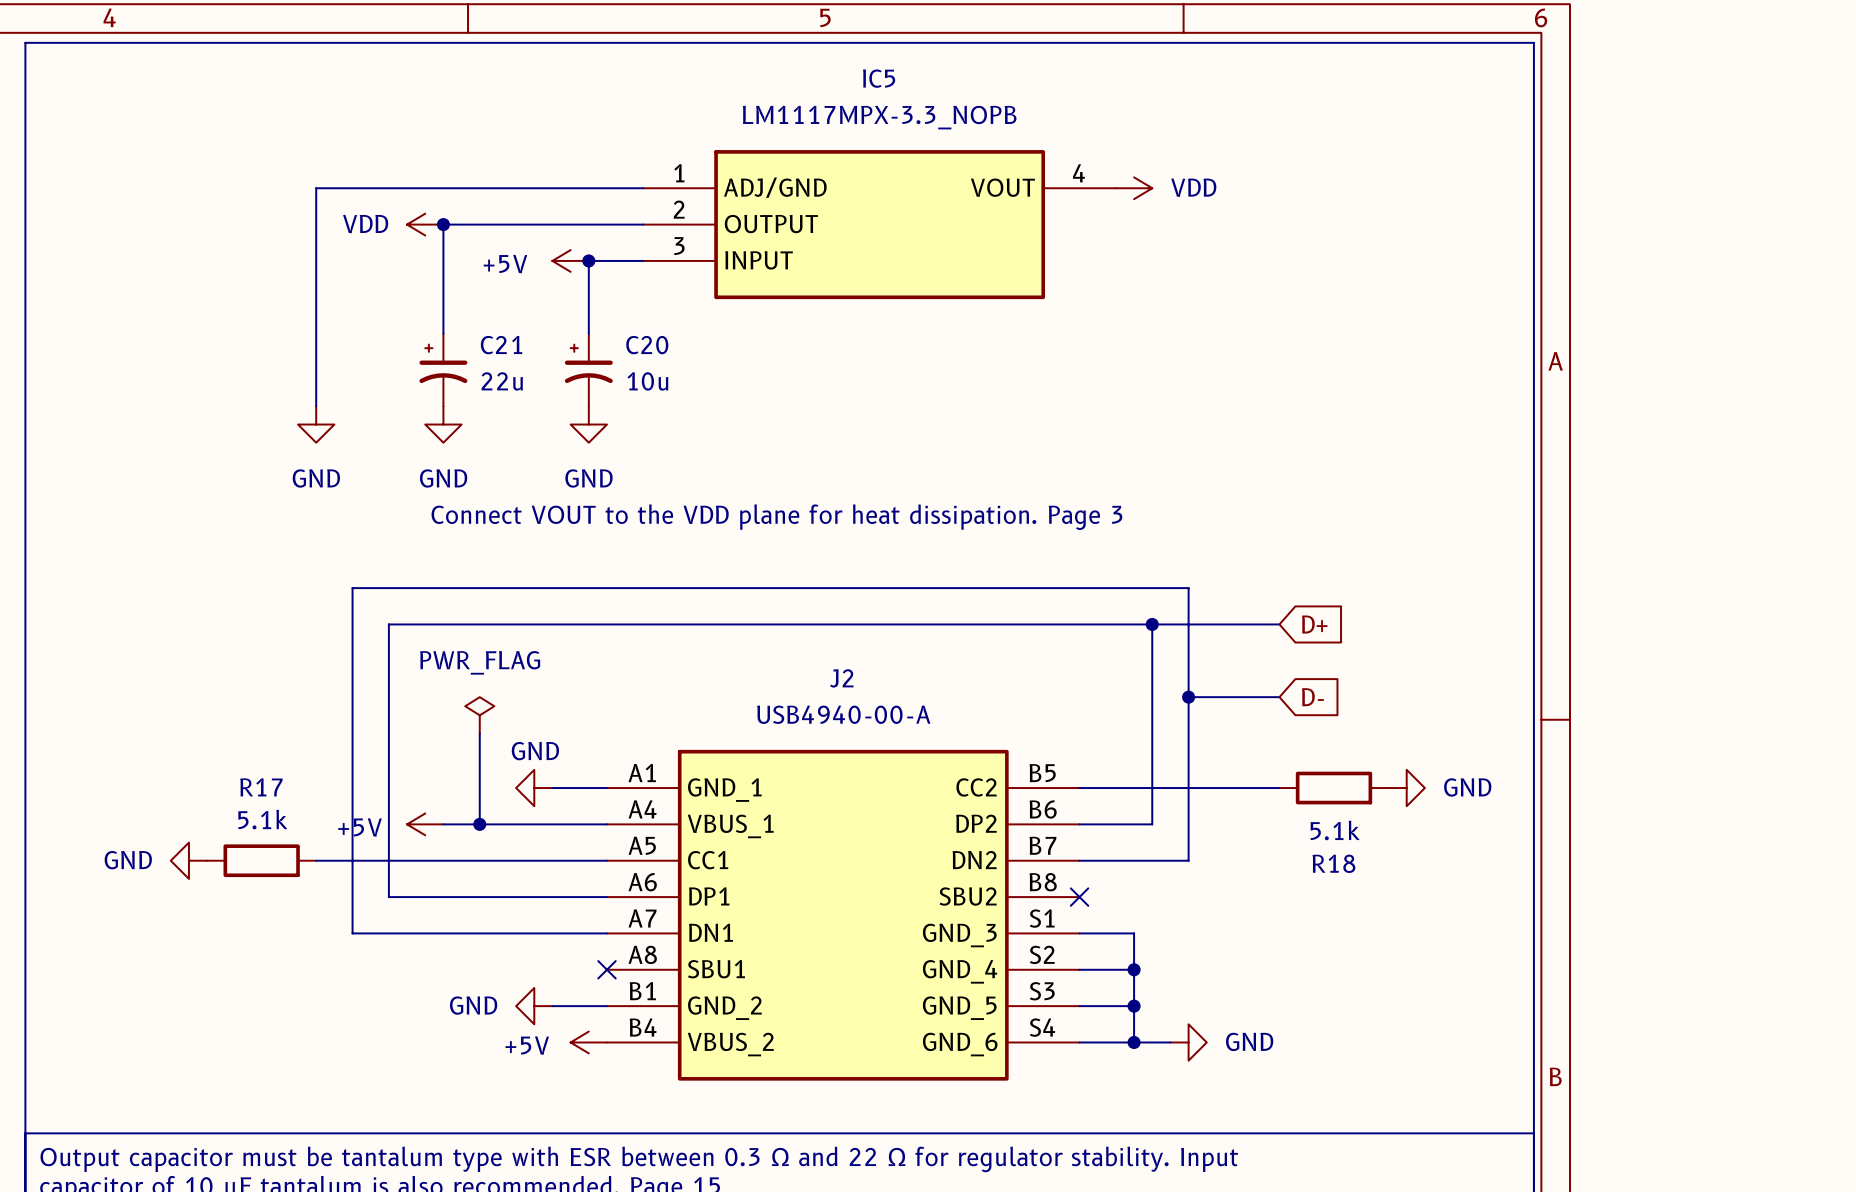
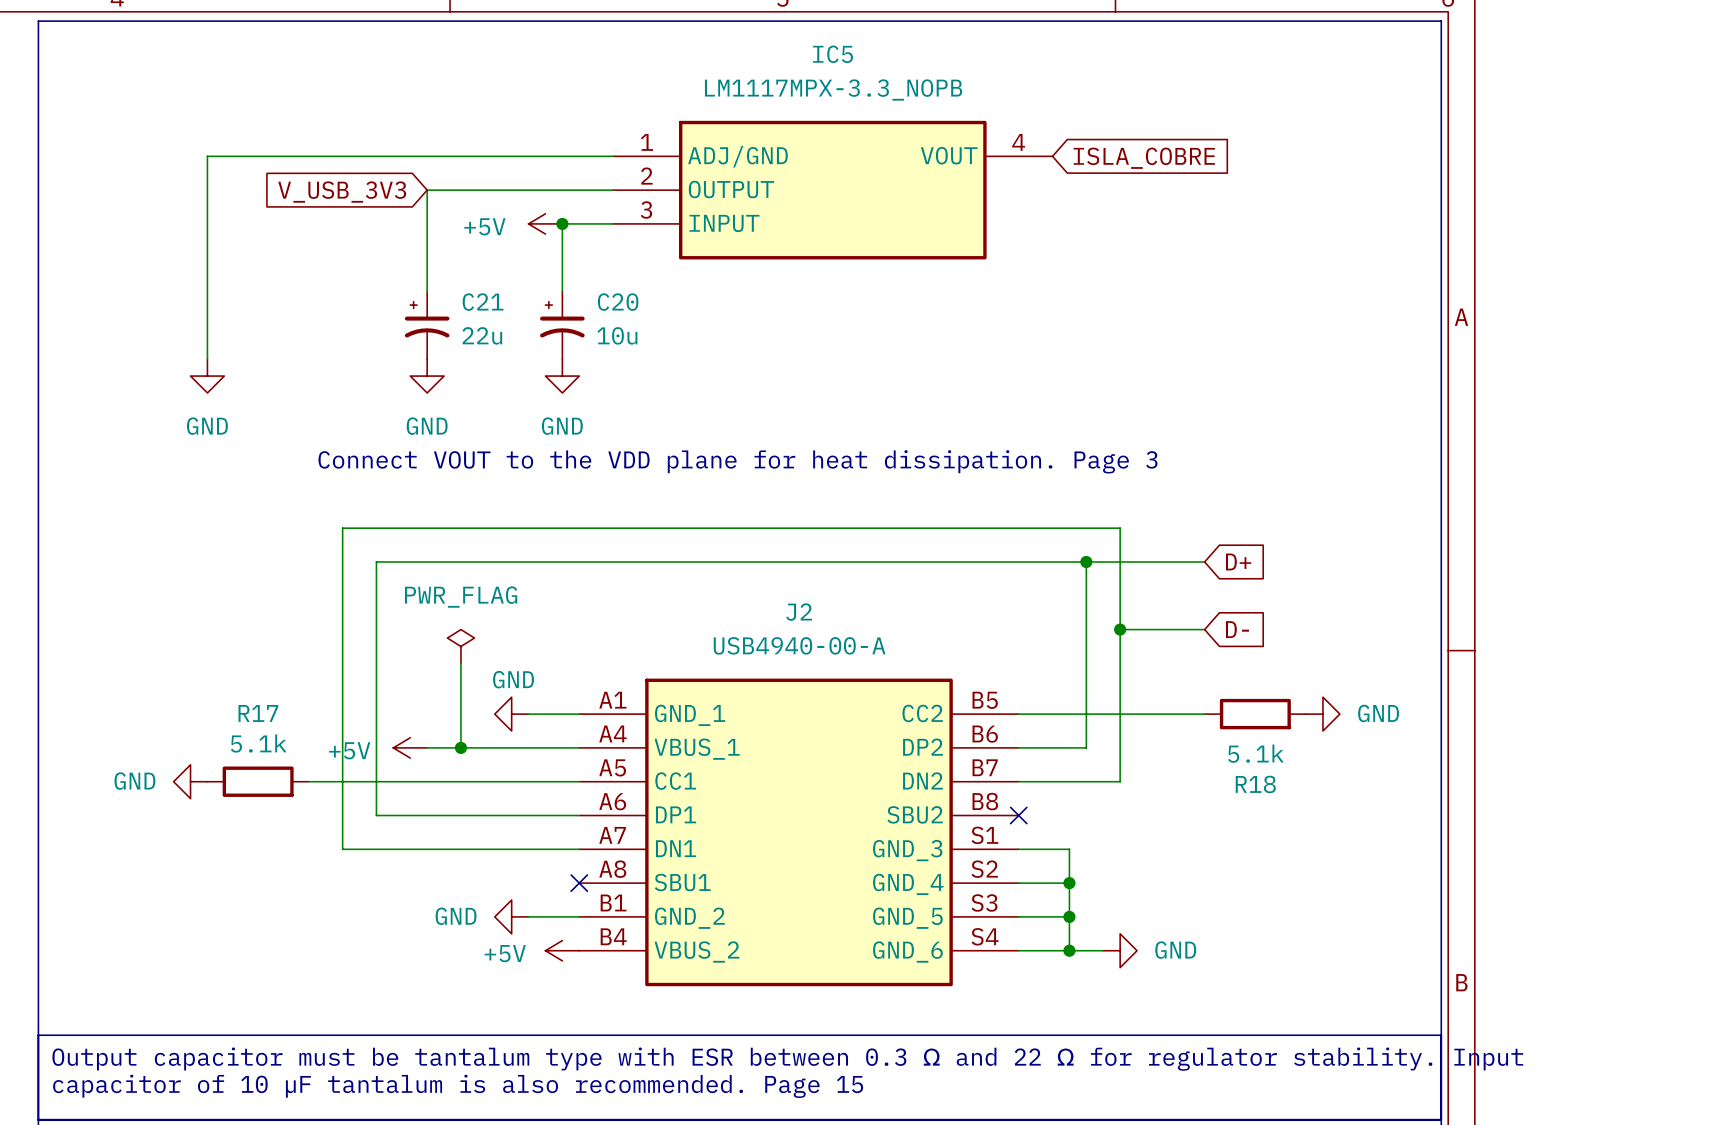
wire: (316, 188) (316, 406) -> (308, 156) (207, 156) (207, 359)
power symbol: VDD (1134, 188) -> none
global label: none -> ISLA_COBRE (1144, 158)
power symbol: VDD (425, 224) -> none
junction: (443, 224) -> none
global label: none -> V_USB_3V3 (342, 192)
power symbol position: GND (316, 424) -> GND (207, 376)

